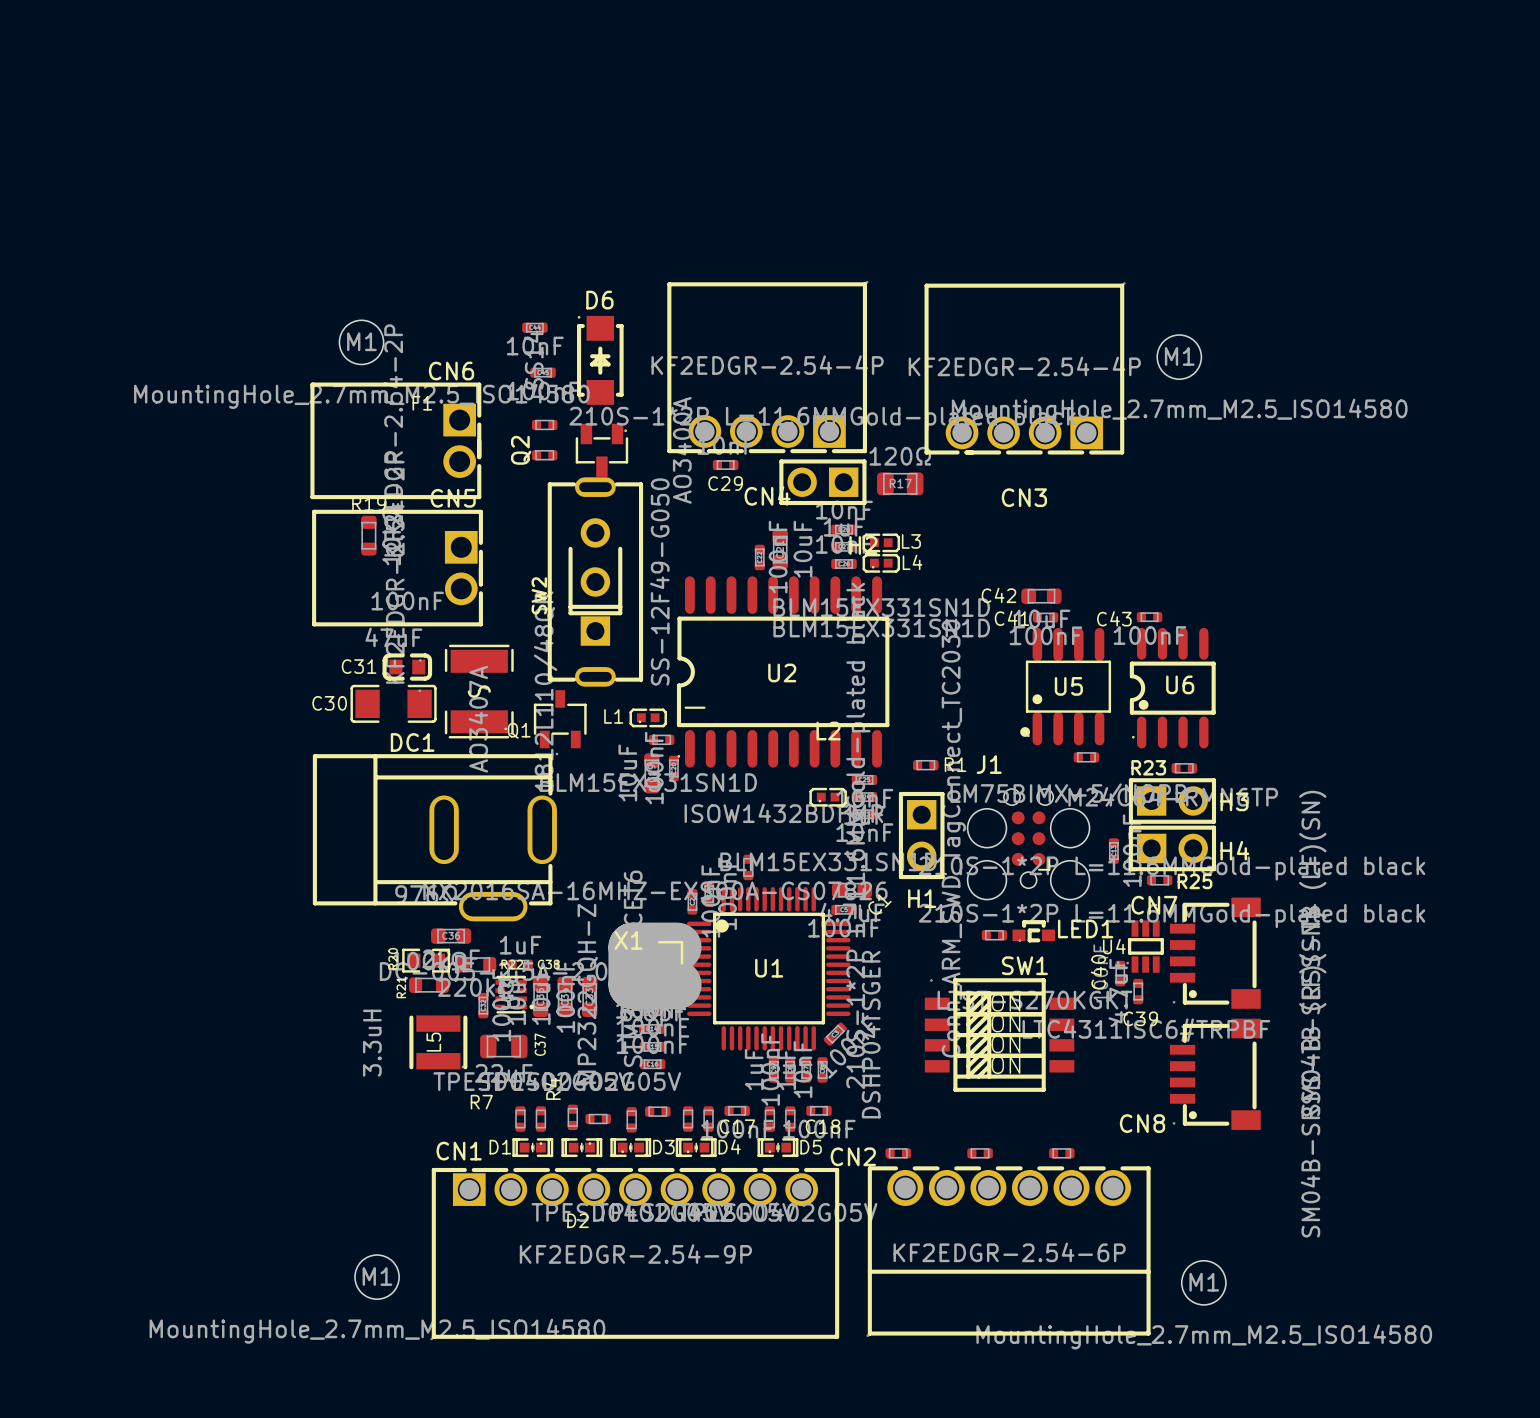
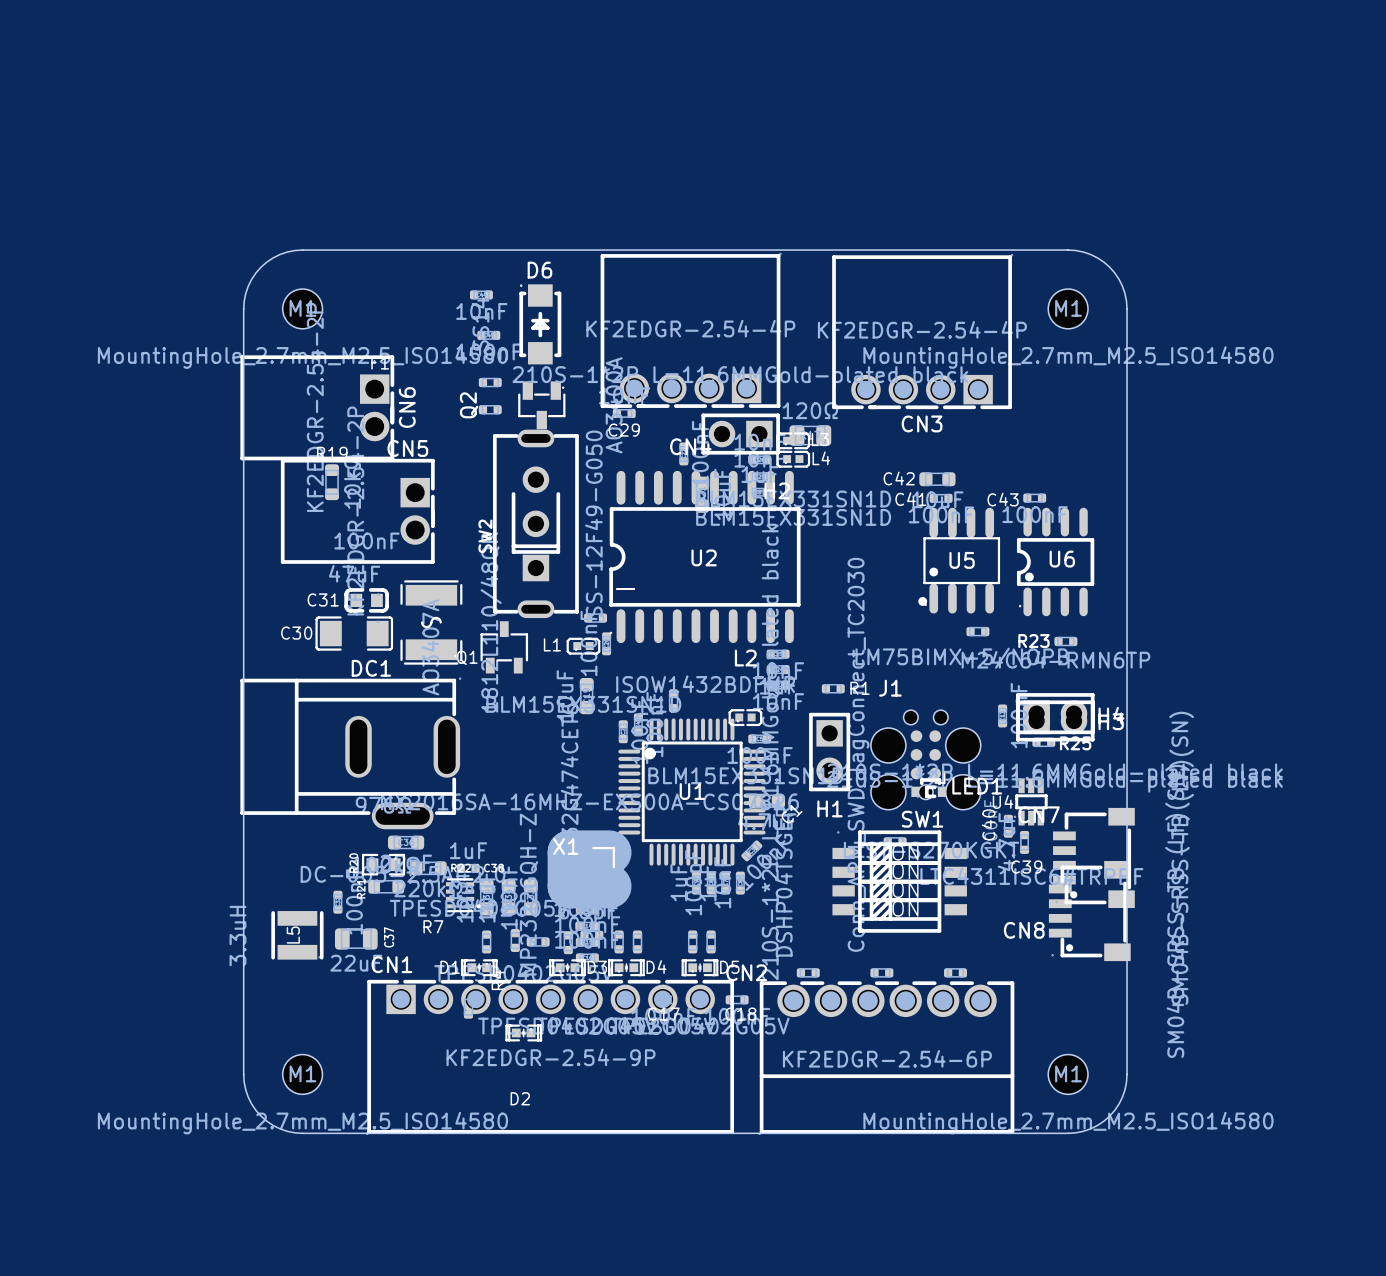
board edge: none -> (302, 250) (1068, 250) (1090, 254) (1109, 267) (1122, 286) (1127, 308) (1127, 1074) (1122, 1096) (1109, 1116) (1090, 1128) (1068, 1133) (302, 1133) (280, 1128) (260, 1116) (248, 1096) (243, 1074) (243, 308) (248, 286) (260, 267) (280, 254) (302, 250)
M1 position: (361, 342) -> (302, 308)
M1 position: (1179, 357) -> (1068, 308)
CN6 name rotation: 0° (451, 371) -> 90° counterclockwise (407, 407)
CN6 name position: CN6 (451, 371) -> CN6 (407, 407)
CN6 position: (395, 440) -> (317, 407)
C29 position: (725, 465) -> (624, 413)
CN3 name position: CN3 (1024, 497) -> CN3 (922, 423)
L3 position: (881, 542) -> (793, 440)
part position: (759, 557) -> (683, 453)
L4 position: (881, 563) -> (793, 459)
part position: (844, 564) -> (759, 459)
C42 position: (1041, 596) -> (937, 479)
C41 position: (1045, 617) -> (941, 498)
C43 position: (1149, 617) -> (1034, 498)
U2 position: (783, 671) -> (704, 556)
part: none -> (595, 618)
U5 position: (1065, 686) -> (959, 560)
U6 position: (1172, 688) -> (1055, 561)
part: (661, 739) -> none
part position: (1086, 757) -> (977, 631)
part position: (673, 768) -> (606, 643)
R23 position: (1184, 768) -> (1065, 641)
part: none -> (673, 700)
part position: (864, 779) -> (778, 654)
part position: (864, 797) -> (778, 669)
part position: (864, 814) -> (778, 685)
DC1 position: (435, 837) -> (350, 753)
H4 position: (1172, 848) -> (1055, 713)
part position: (1113, 851) -> (1002, 715)
part: (748, 867) -> none
R25 position: (1159, 880) -> (1043, 742)
part position: (709, 894) -> (638, 724)
part position: (692, 901) -> (623, 731)
part position: (844, 909) -> (759, 738)
LED1 position: (1033, 931) -> (930, 788)
U4 position: (1144, 946) -> (1029, 801)
U1 position: (768, 968) -> (691, 792)
C40 position: (1120, 973) -> (1008, 826)
C39 position: (1138, 991) -> (1024, 842)
part position: (483, 1005) -> (337, 902)
part position: (835, 1034) -> (751, 850)
SW1 position: (999, 1035) -> (899, 881)
part: none -> (591, 935)
L5 position: (438, 1042) -> (297, 935)
part: none -> (515, 940)
C37 position: (503, 1046) -> (356, 939)
part: none -> (538, 941)
part: none -> (619, 941)
part: none -> (637, 941)
part: none -> (692, 941)
part: none -> (711, 941)
part: none -> (568, 942)
part position: (773, 1069) -> (696, 883)
part position: (790, 1069) -> (711, 883)
part position: (806, 1069) -> (725, 883)
part position: (822, 1069) -> (740, 883)
CN8 position: (1215, 1074) -> (1089, 911)
part: none -> (808, 972)
part: none -> (881, 972)
part: none -> (955, 972)
part: (657, 1111) -> none
part: (572, 1117) -> none
R7 position: (540, 1118) -> (486, 941)
part: (598, 1118) -> none
part: (688, 1118) -> none
part: (708, 1118) -> none
part: (769, 1118) -> none
part: (790, 1118) -> none
part: (631, 1119) -> none
CN8 name position: CN8 (1142, 1123) -> CN8 (1024, 930)
D1 position: (532, 1147) -> (479, 967)
D3 position: (630, 1147) -> (567, 967)
D4 position: (696, 1147) -> (626, 967)
D5 position: (777, 1147) -> (700, 967)
part: (898, 1153) -> none
part: (980, 1153) -> none
part: (1061, 1153) -> none
CN2 position: (1008, 1251) -> (886, 1058)
CN1 position: (634, 1253) -> (550, 1057)
M1 position: (377, 1277) -> (302, 1074)
M1 position: (1203, 1282) -> (1068, 1074)

